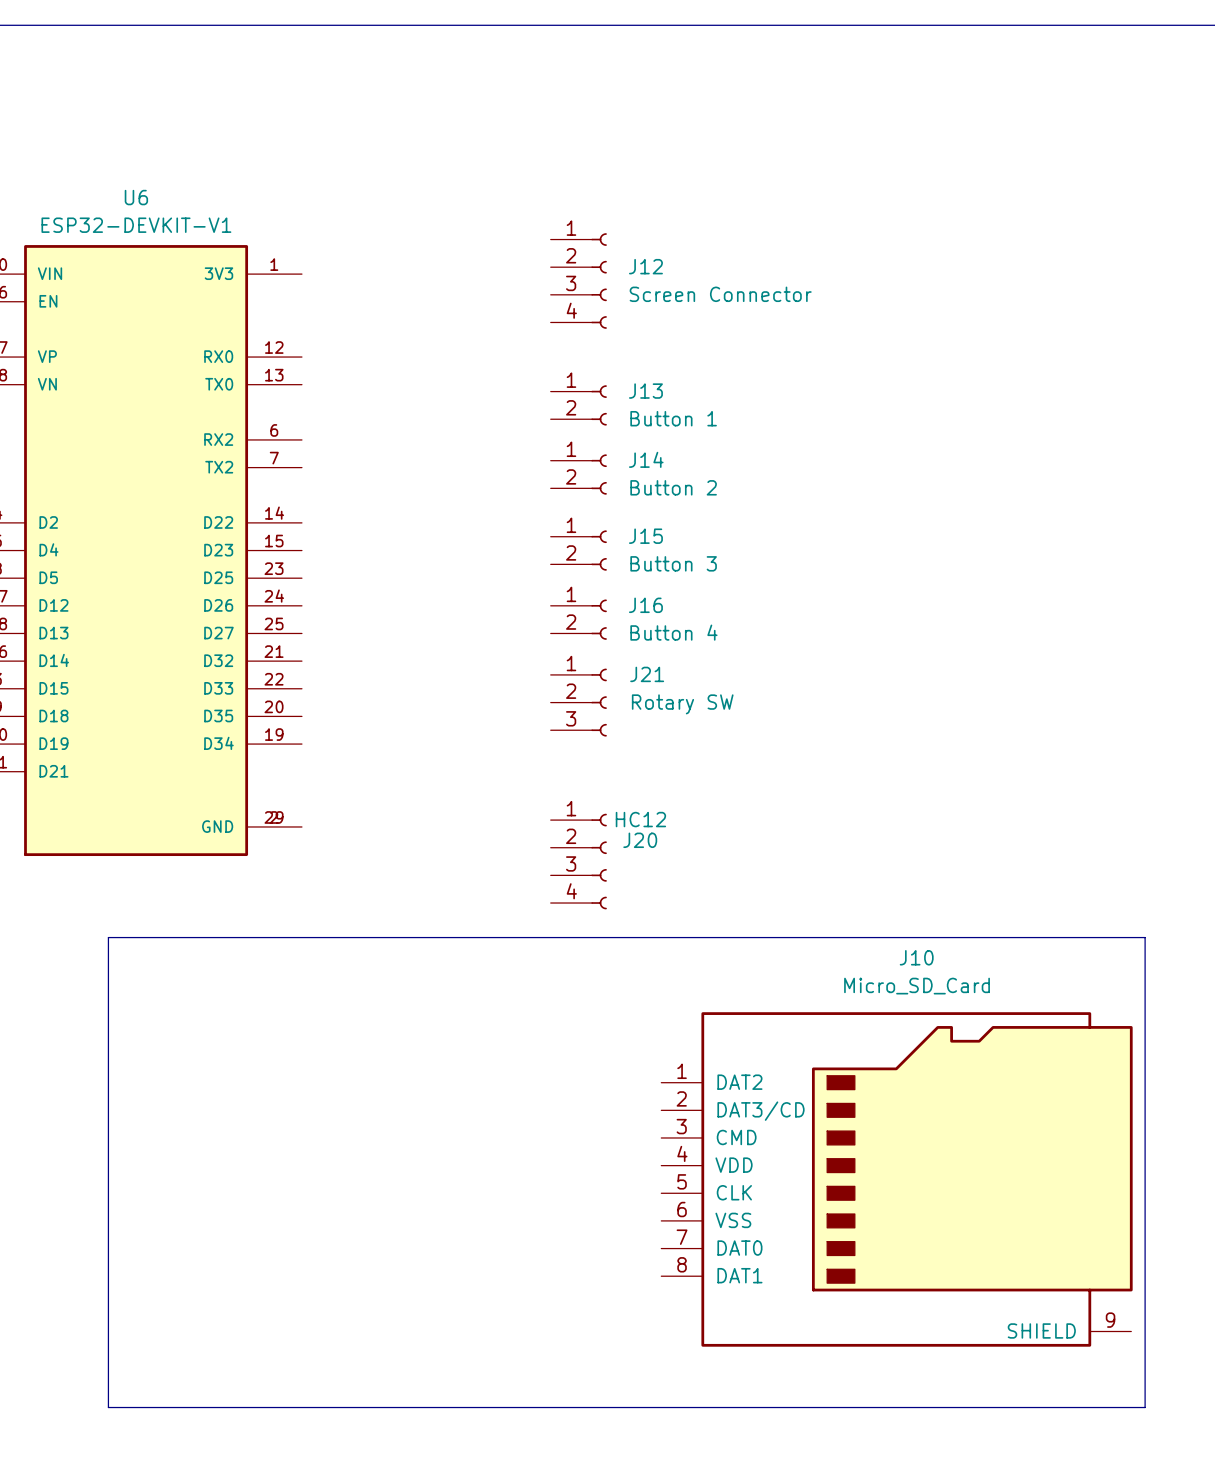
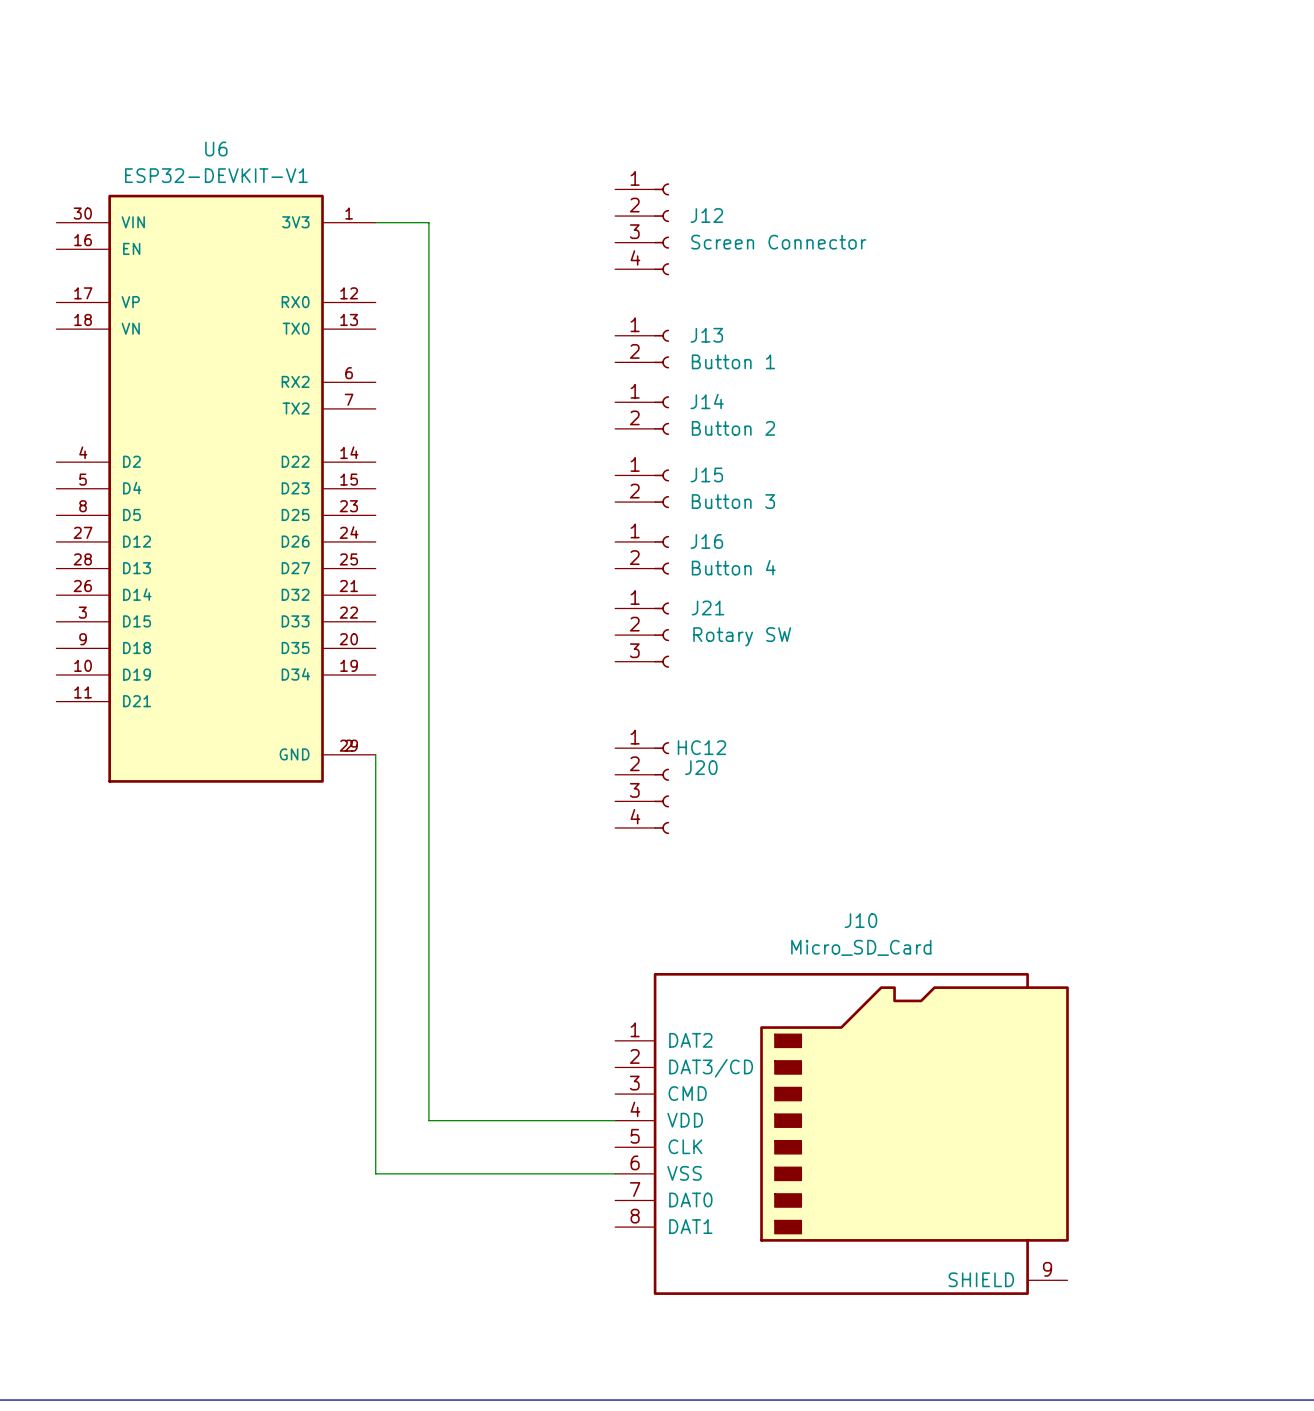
wire: none -> (375, 222) (428, 222) (428, 1120) (615, 1120)
wire: none -> (375, 754) (375, 1173) (615, 1173)
line: (108, 937) (1145, 937) (1145, 1407) (108, 1407) (108, 937) -> none
J10 position: (896, 1179) -> (842, 1133)

